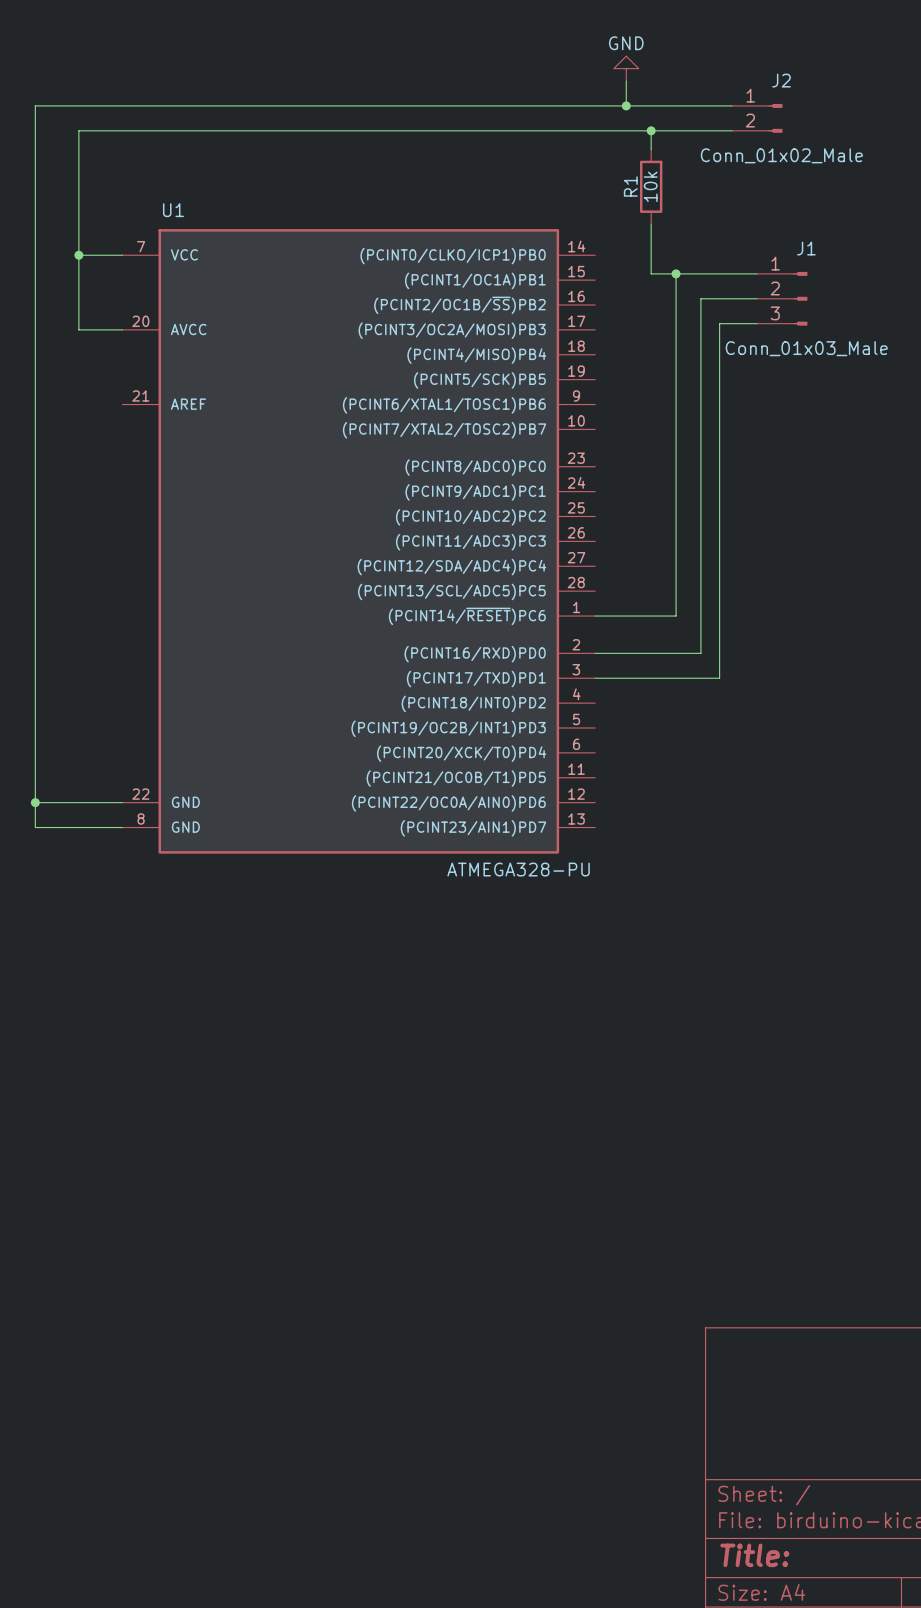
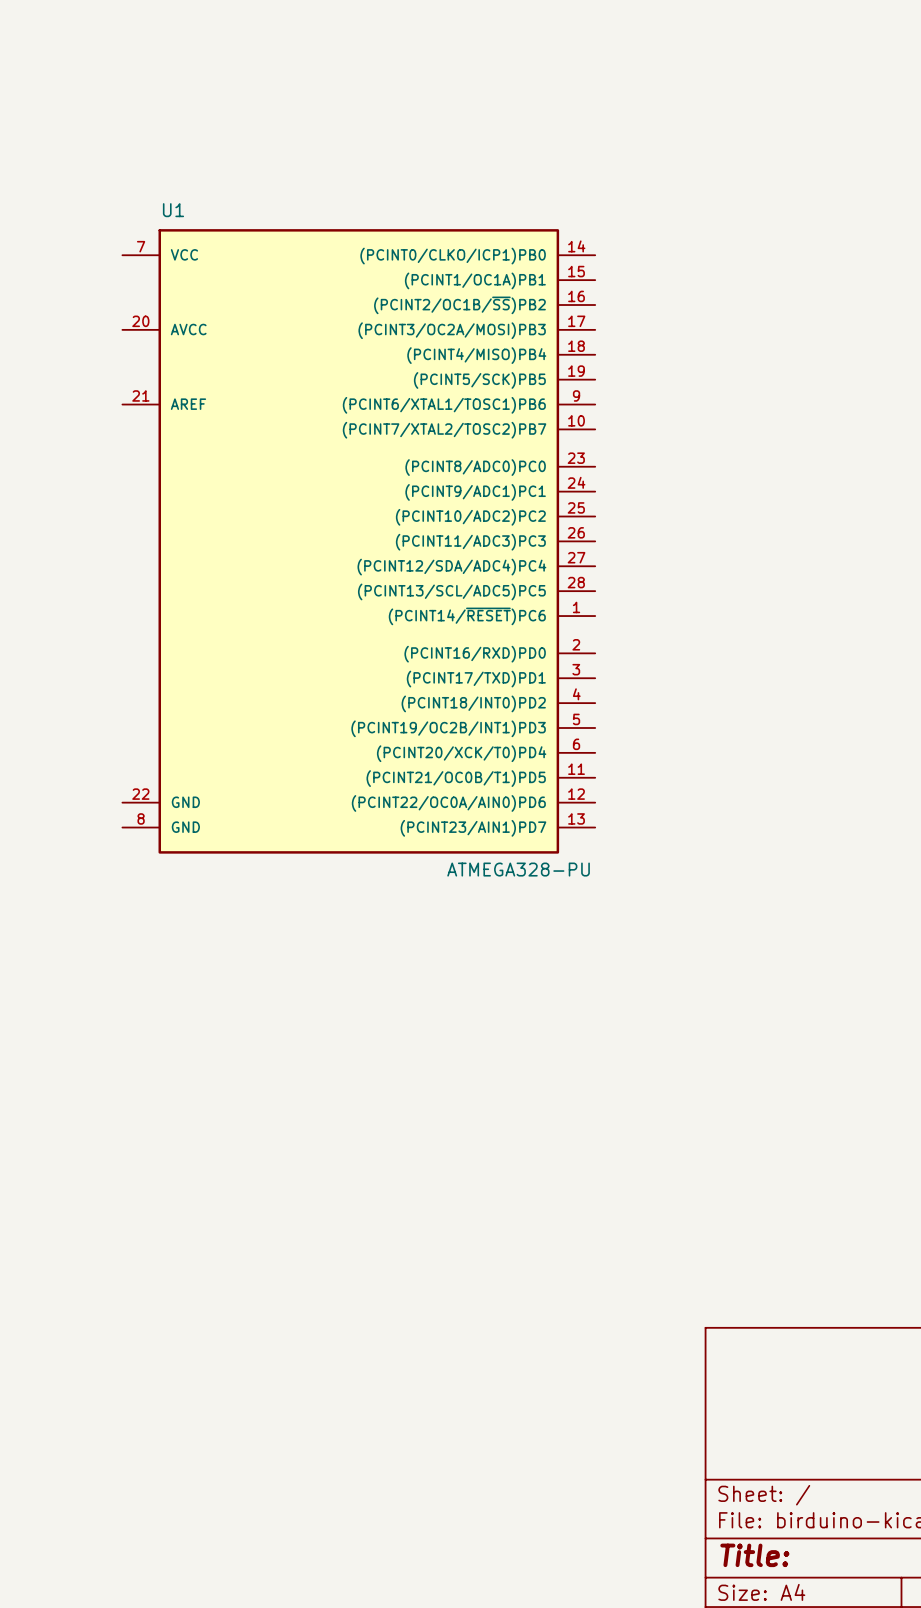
power symbol: GND (626, 68) -> none
wire: (626, 81) (626, 105) -> none
junction: (626, 105) -> none
wire: (732, 105) (35, 105) (35, 827) (122, 827) -> none
J2: Conn_01x02_Male (757, 118) -> none
wire: (651, 130) (651, 149) -> none
junction: (651, 130) -> none
wire: (732, 130) (78, 130) (78, 329) (122, 329) -> none
R1: 10k (651, 186) -> none
wire: (651, 224) (651, 273) (756, 273) -> none
wire: (78, 255) (122, 255) -> none
junction: (78, 255) -> none
wire: (676, 273) (676, 616) (595, 616) -> none
junction: (676, 273) -> none
wire: (756, 298) (700, 298) (700, 653) (595, 653) -> none
J1: Conn_01x03_Male (782, 298) -> none
wire: (756, 323) (719, 323) (719, 678) (595, 678) -> none
wire: (35, 802) (122, 802) -> none
junction: (35, 802) -> none

